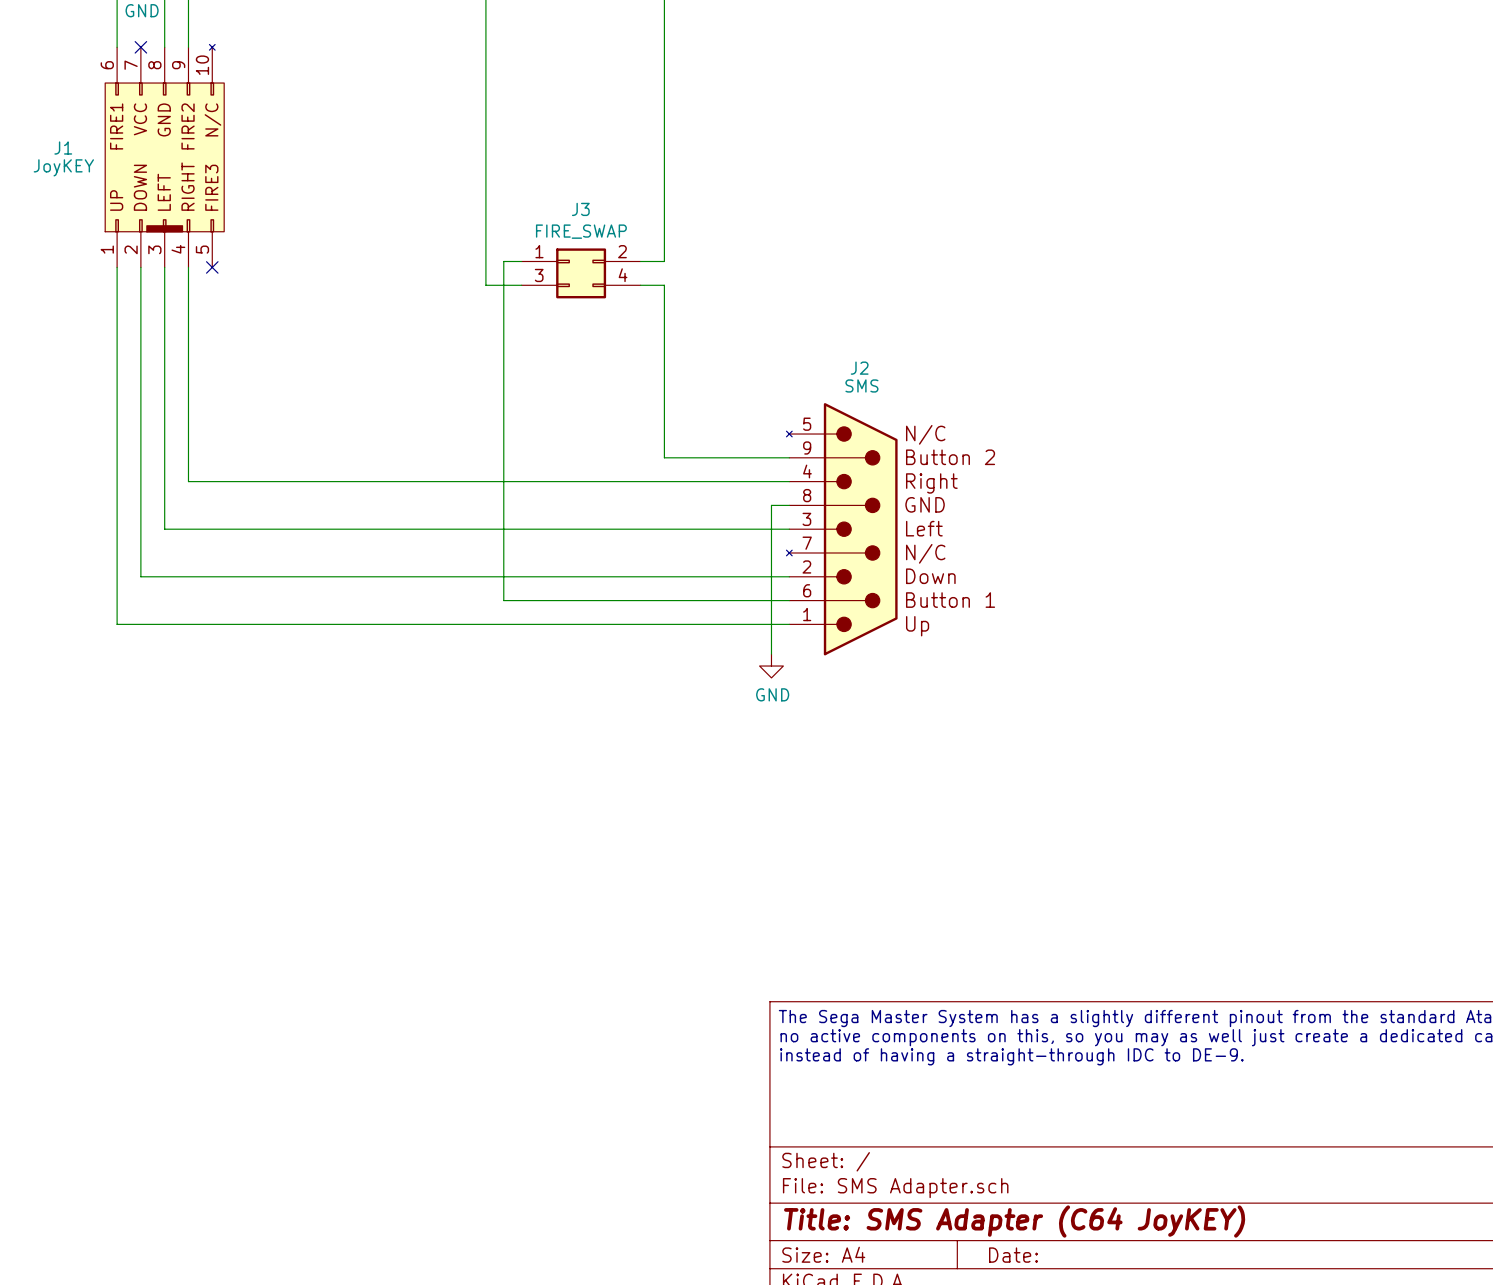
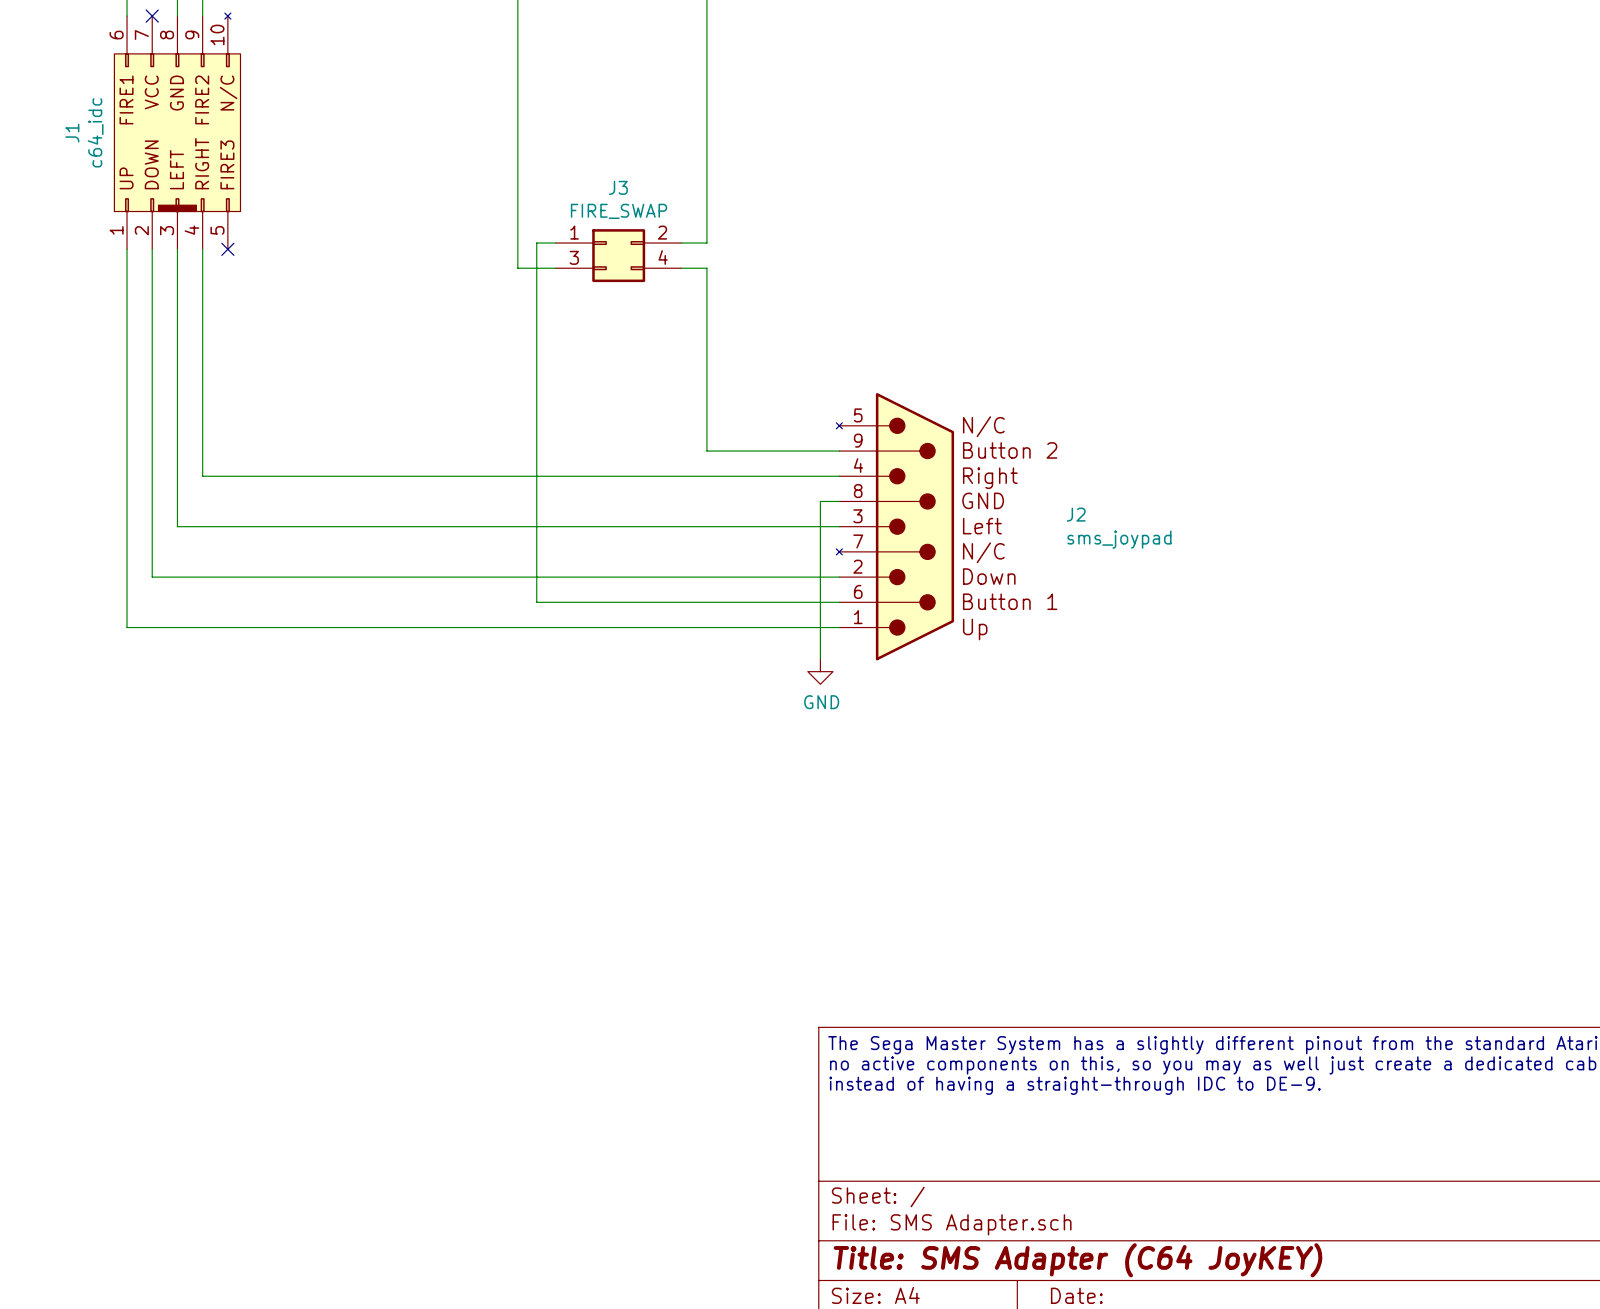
J1 name rotation: 0° (63, 148) -> 90° counterclockwise (72, 133)
J1 value: JoyKEY (63, 167) -> c64_idc (95, 132)
J2 name position: J2 (859, 368) -> J2 (1076, 514)
J2 value: SMS (861, 385) -> sms_joypad (1119, 539)

